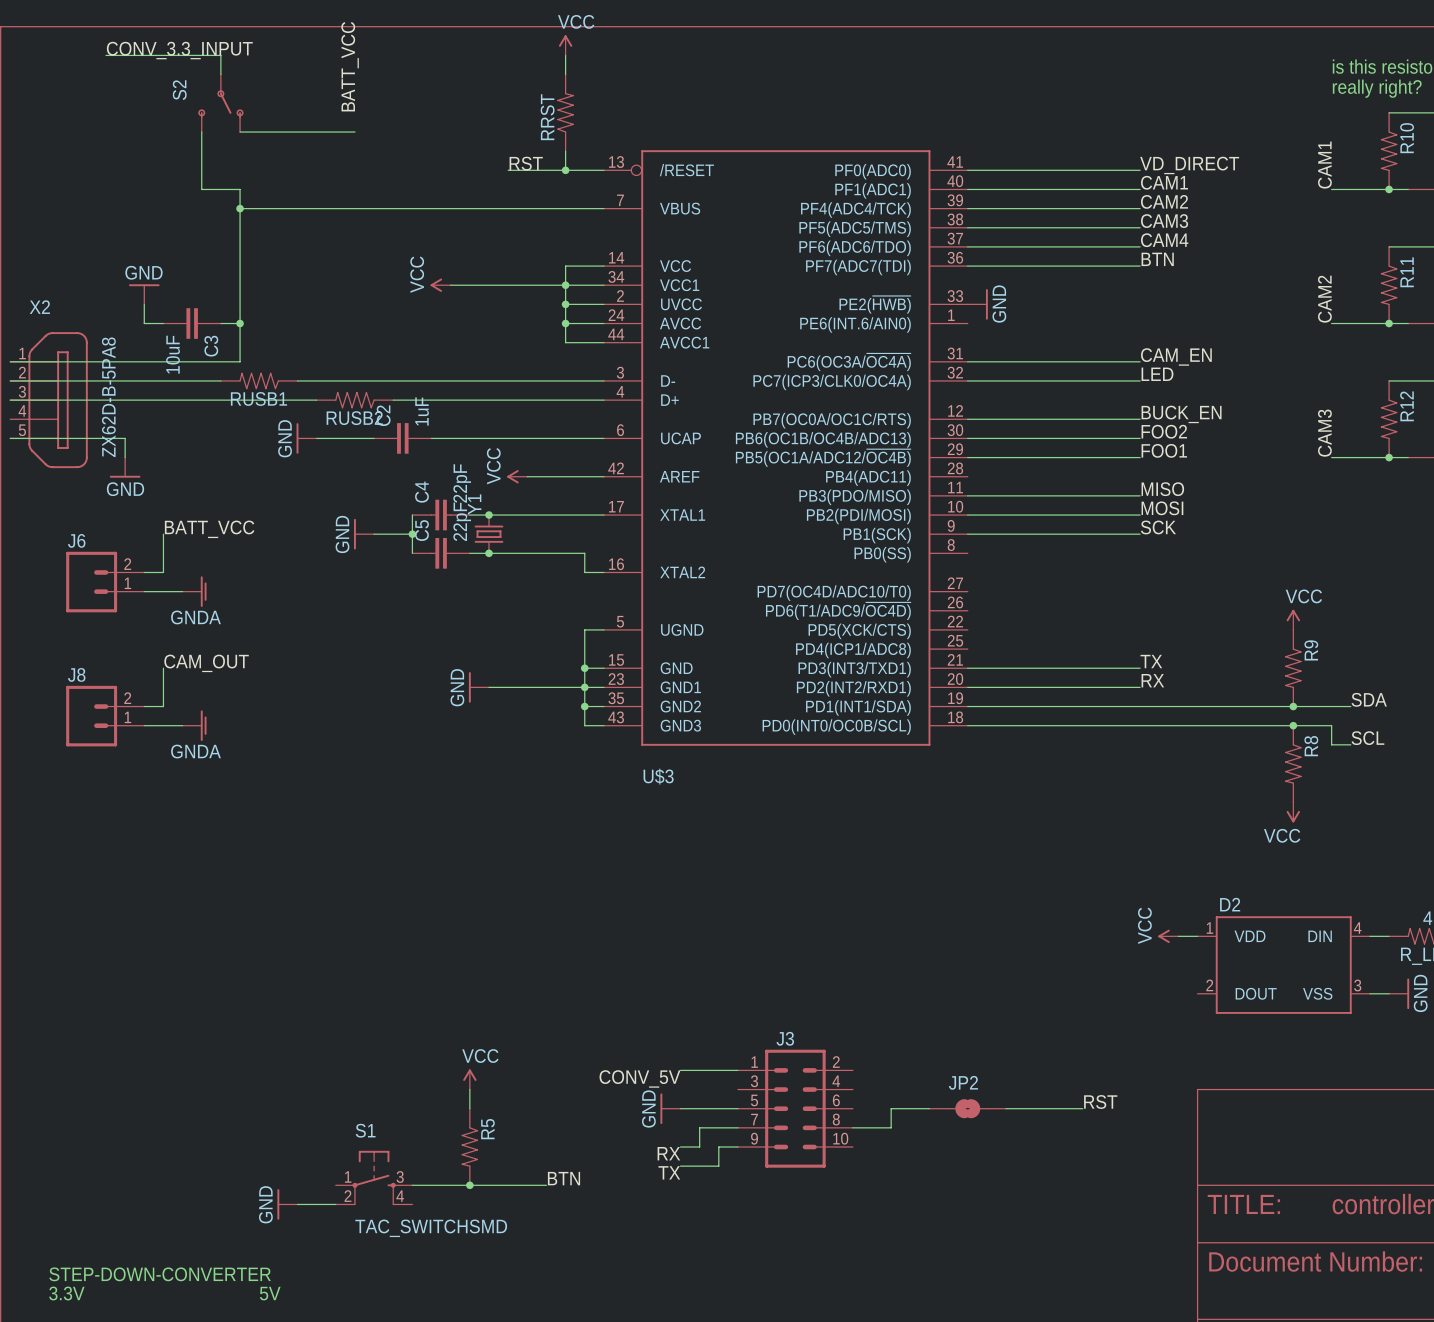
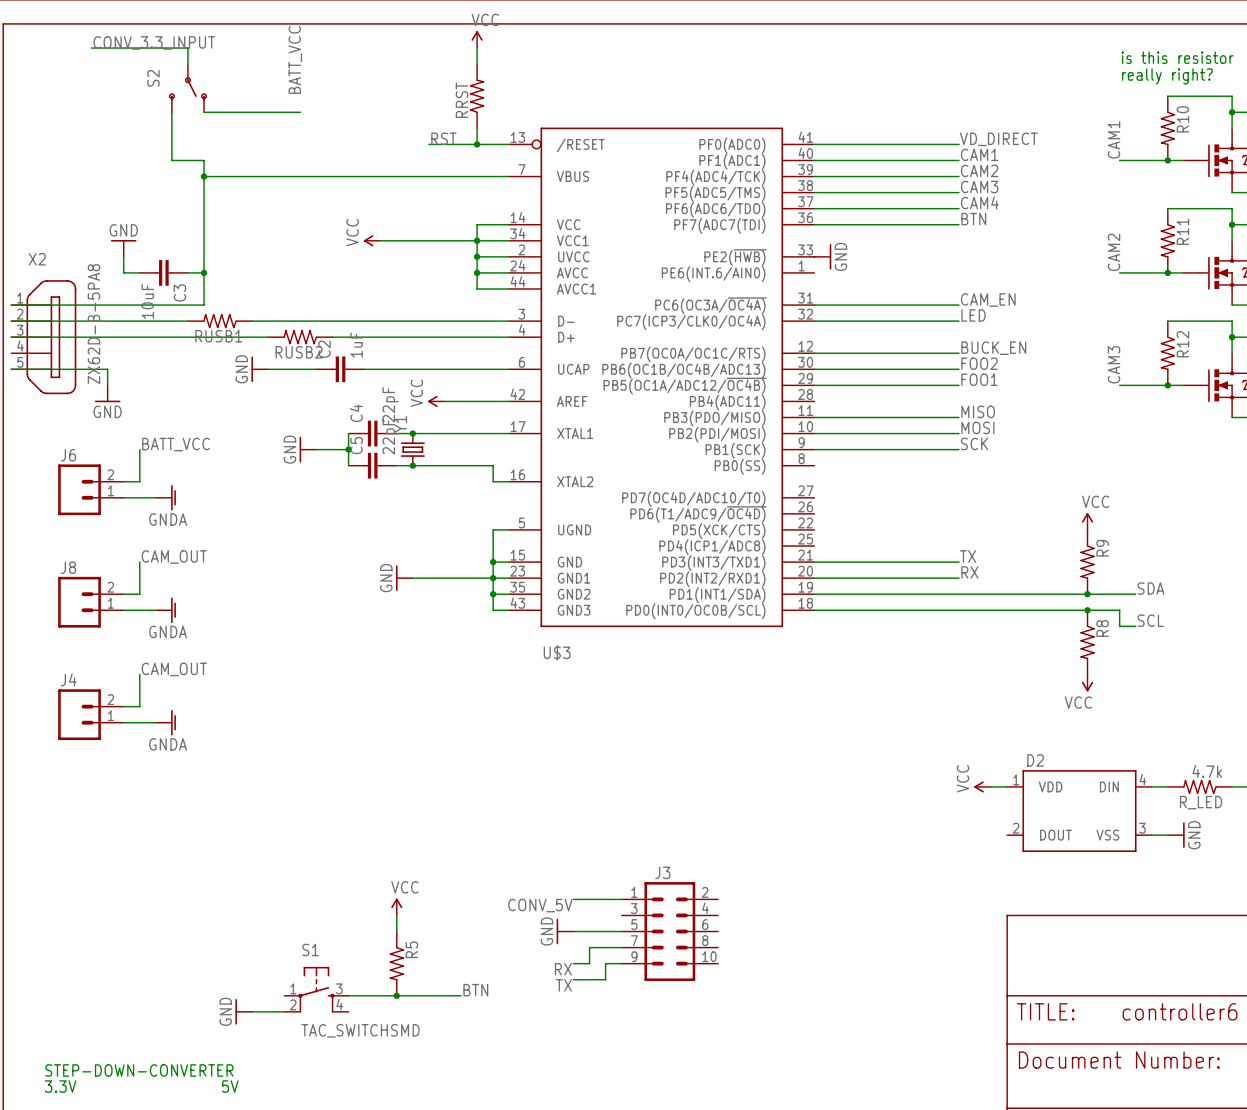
label: none -> CAM_OUT (174, 669)
wire: none -> (139, 674) (139, 706) (123, 706)
J4: none -> (90, 714)
wire: none -> (123, 722) (155, 722)
power symbol: none -> GNDA (165, 722)
label: RST (1100, 1101) -> none
wire: (929, 1108) (891, 1108) (891, 1127) (852, 1127) -> none
JP2: (967, 1108) -> none
wire: (1006, 1108) (1082, 1108) -> none

